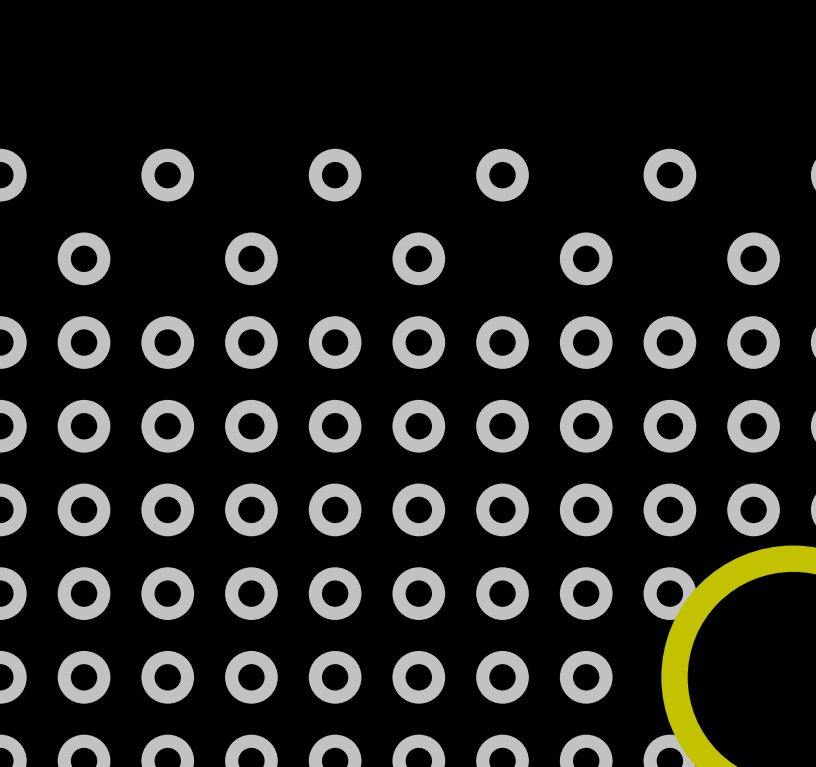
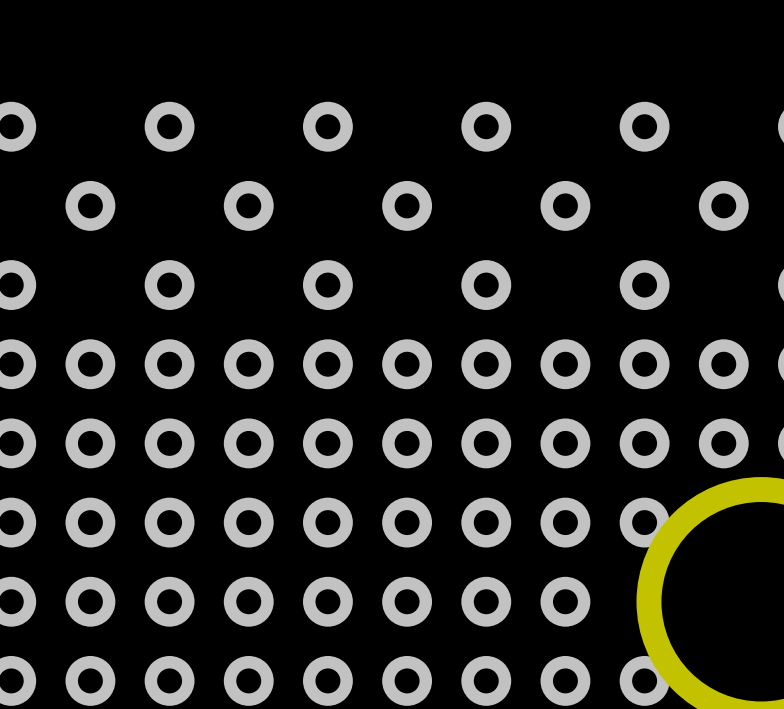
via: (84, 342) -> none
via: (251, 342) -> none
via: (418, 342) -> none
via: (586, 342) -> none
via: (753, 342) -> none

